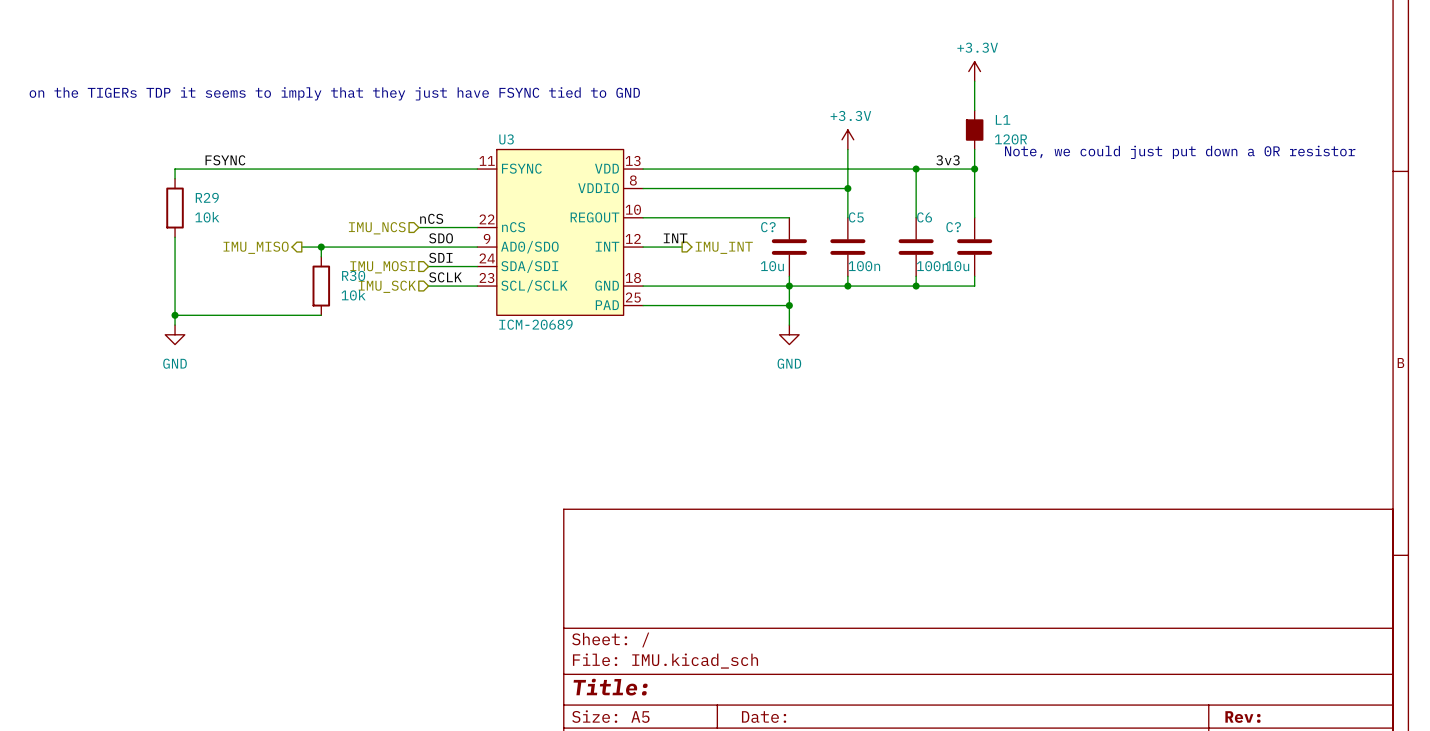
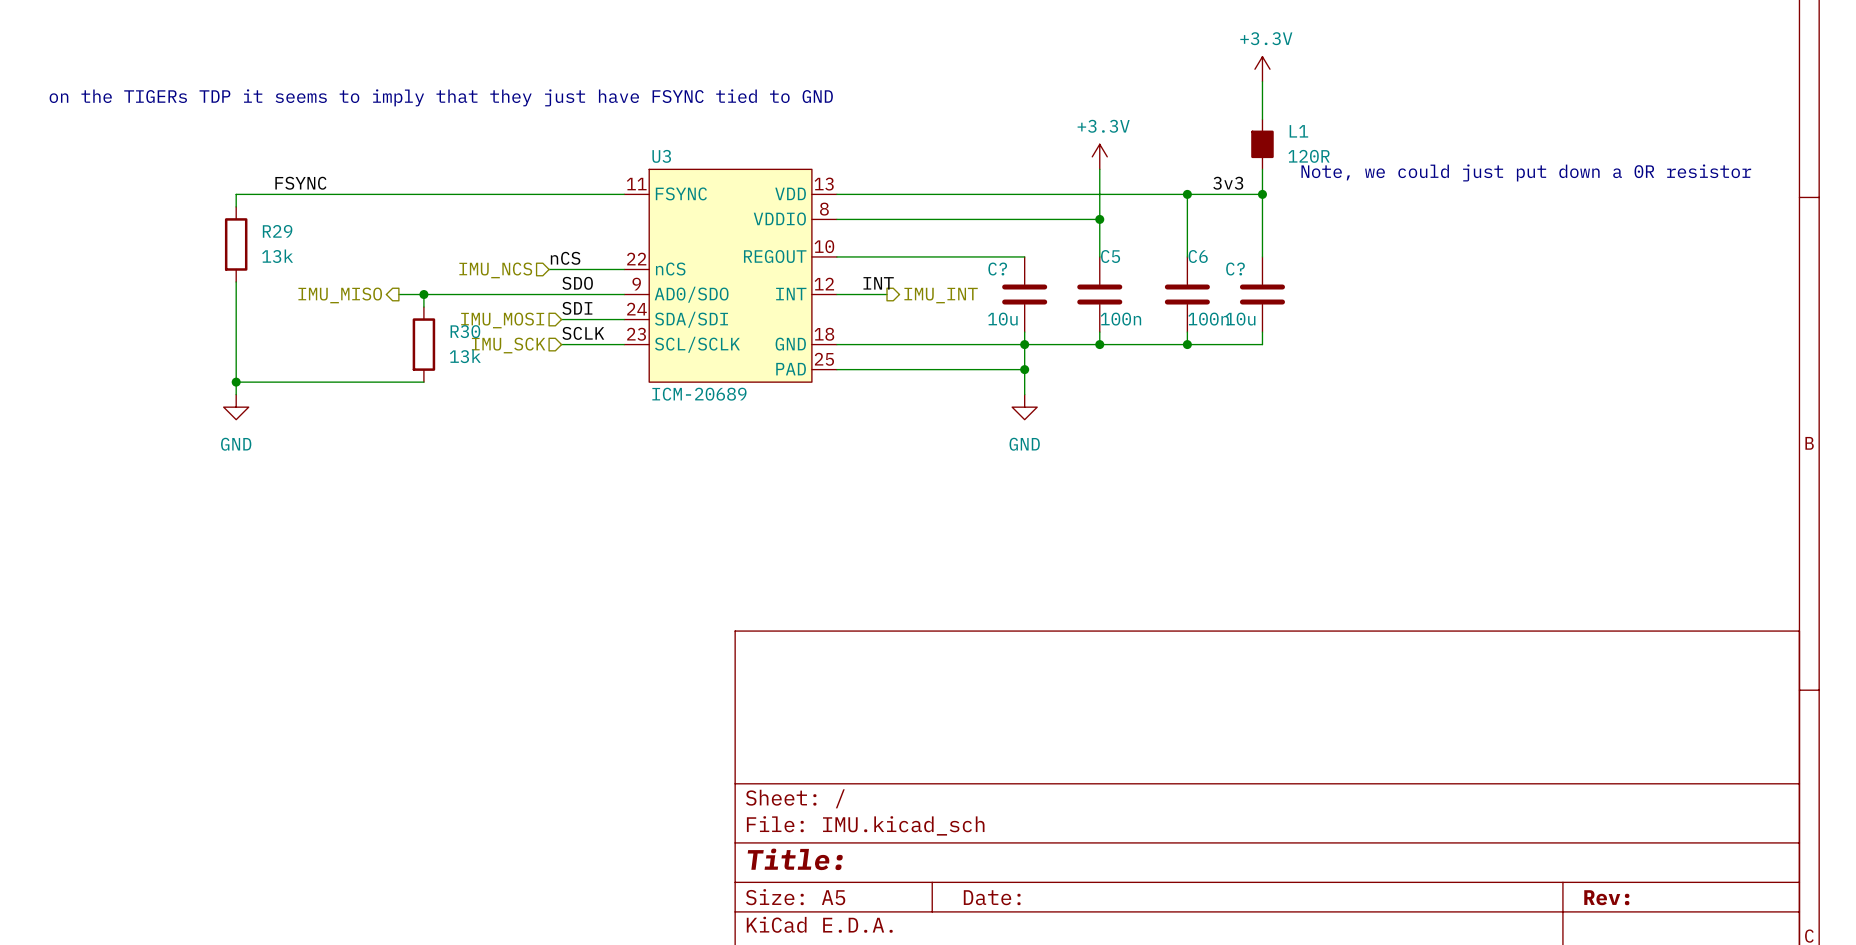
R29 value: 10k (207, 217) -> 13k (277, 256)
R30 value: 10k (353, 295) -> 13k (465, 356)

